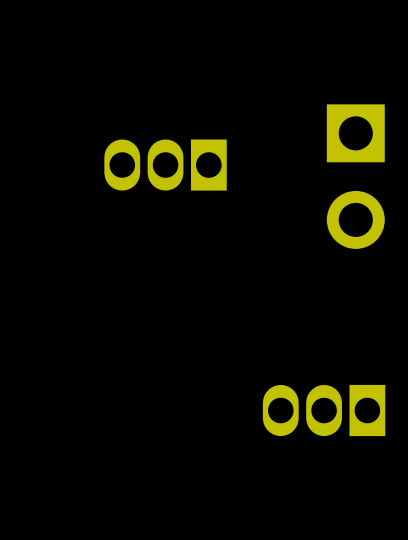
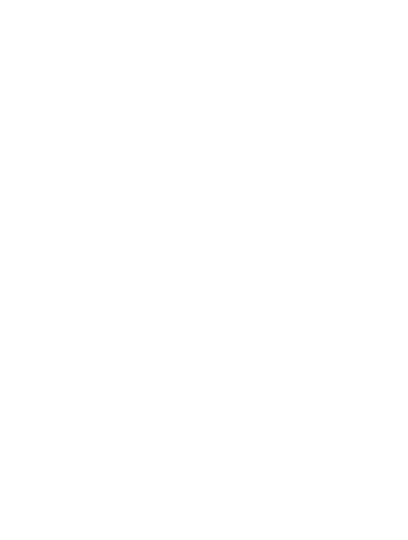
part: (165, 165) -> none
part: (355, 176) -> none
part: (324, 410) -> none

